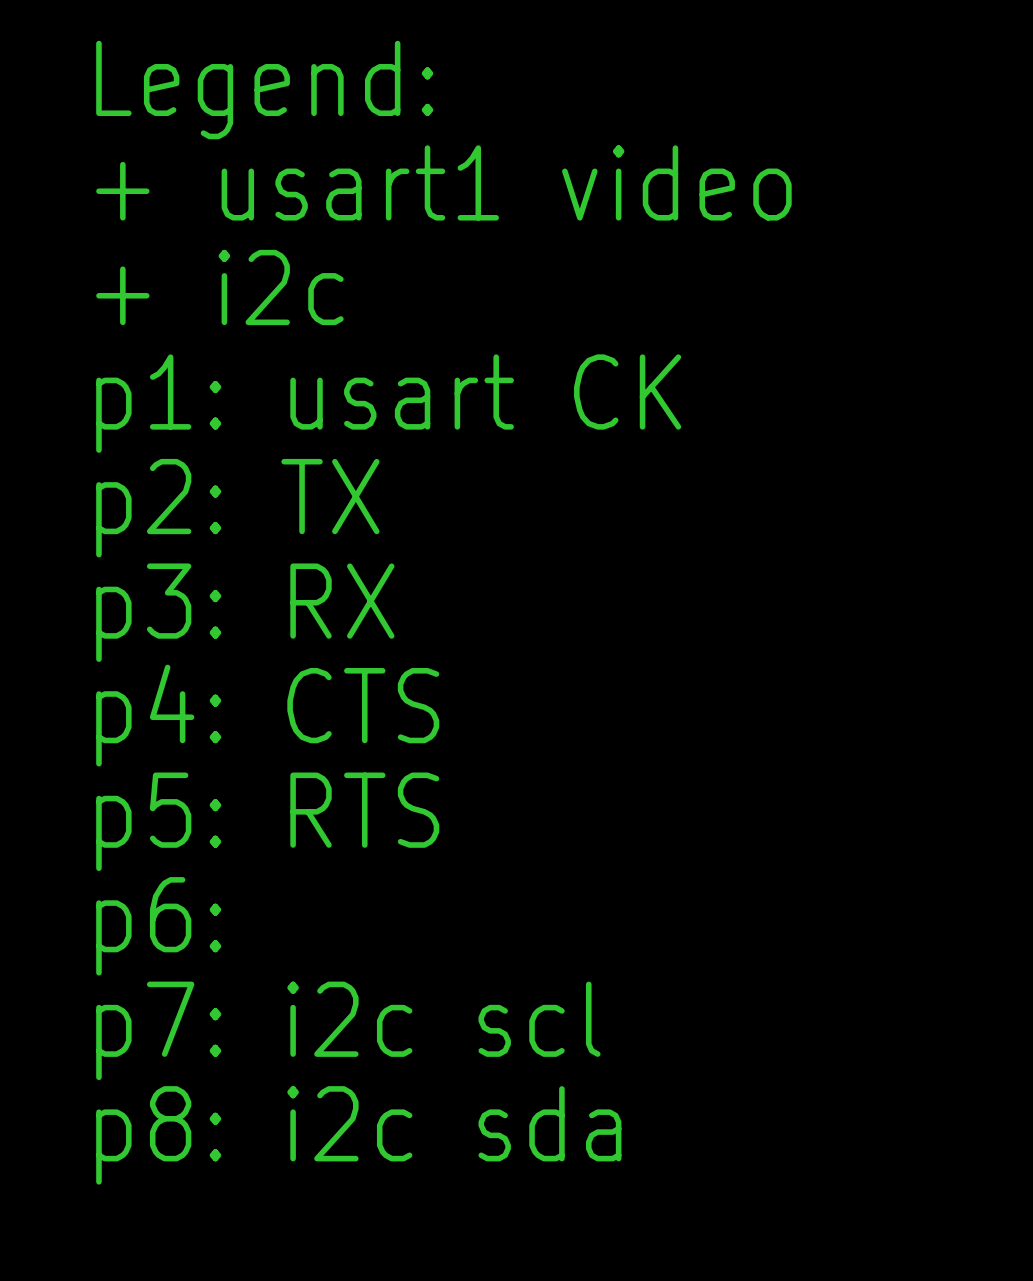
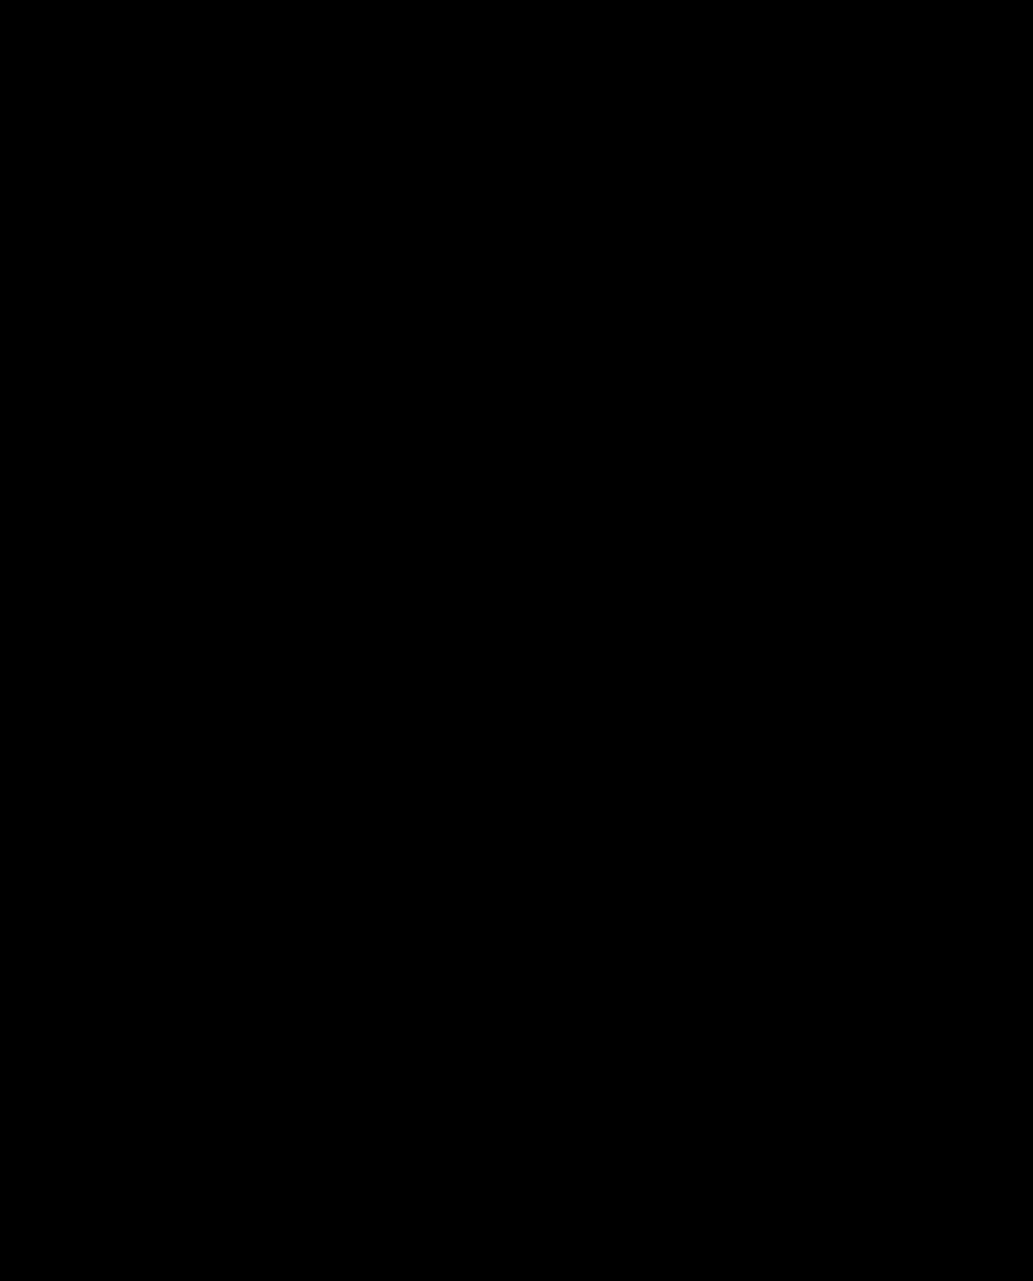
text: Legend: (264, 90) -> none
text: + usart1 video (443, 182) -> none
text: + i2c (219, 287) -> none
text: p1: usart CK (388, 403) -> none
text: p2: TX (237, 508) -> none
text: p3: RX (245, 612) -> none
text: p4: CTS (267, 715) -> none
text: p5: RTS (267, 821) -> none
text: p6: (158, 926) -> none
text: p7: i2c scl (348, 1030) -> none
text: p8: i2c sda (358, 1135) -> none

